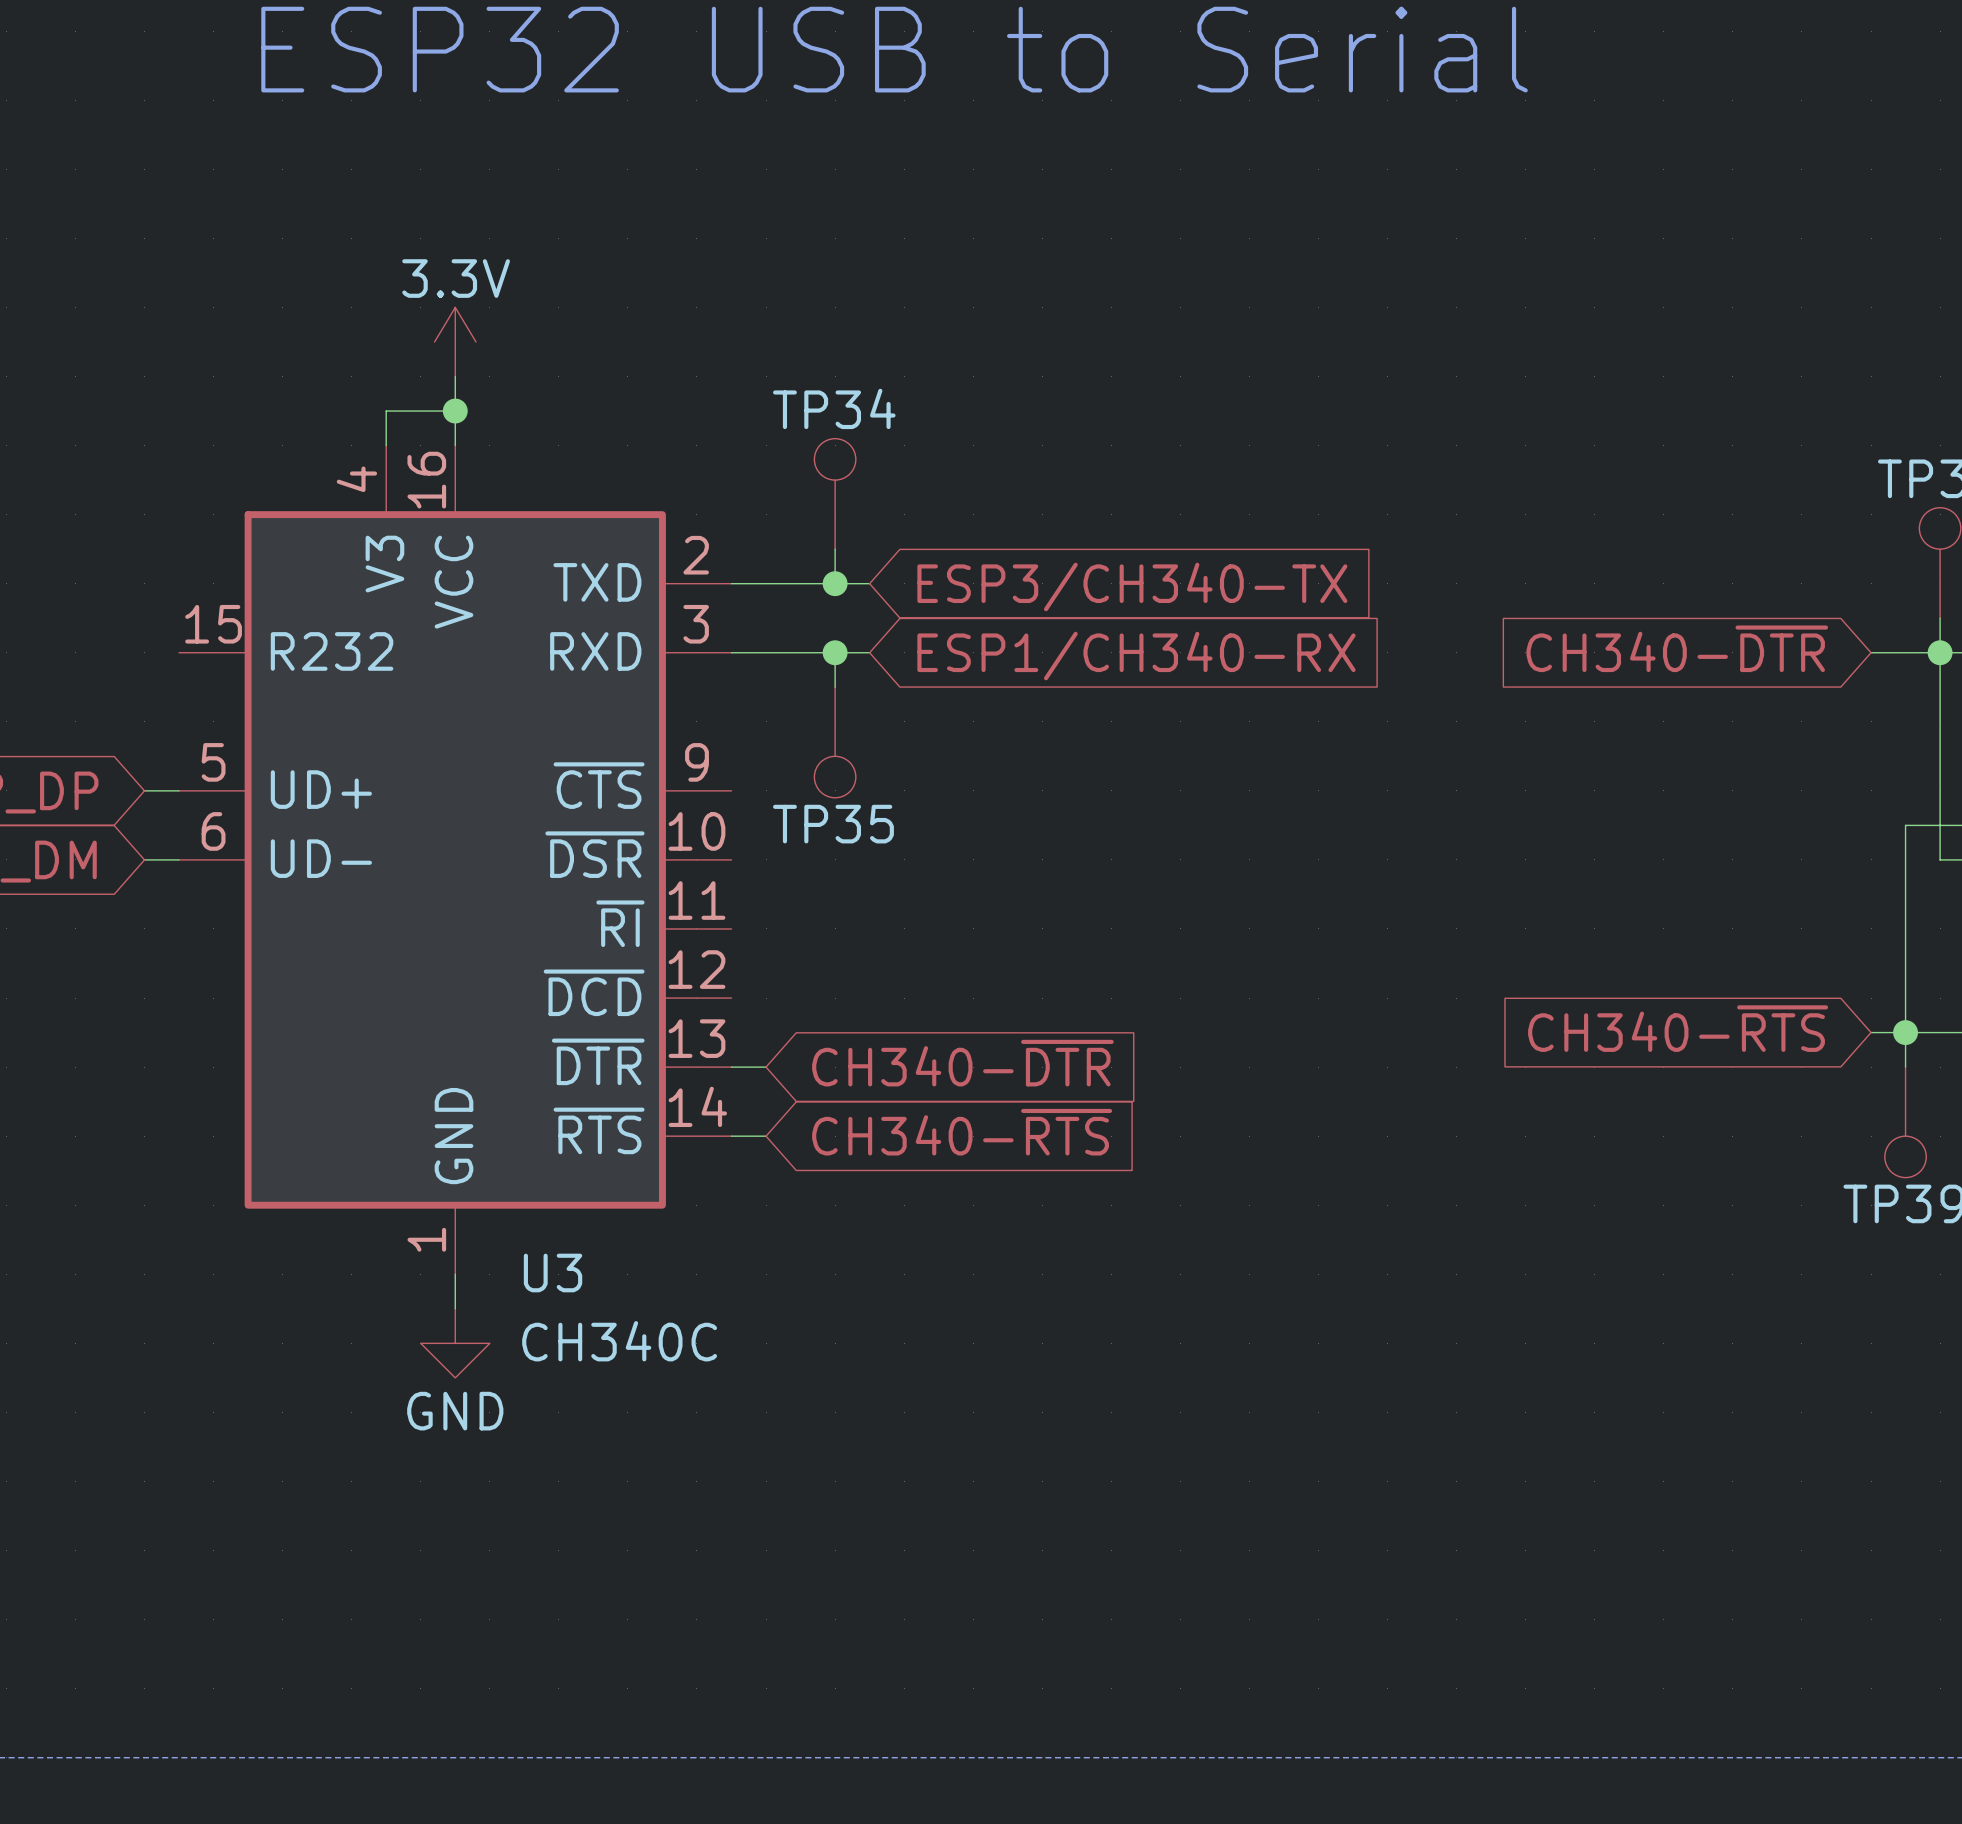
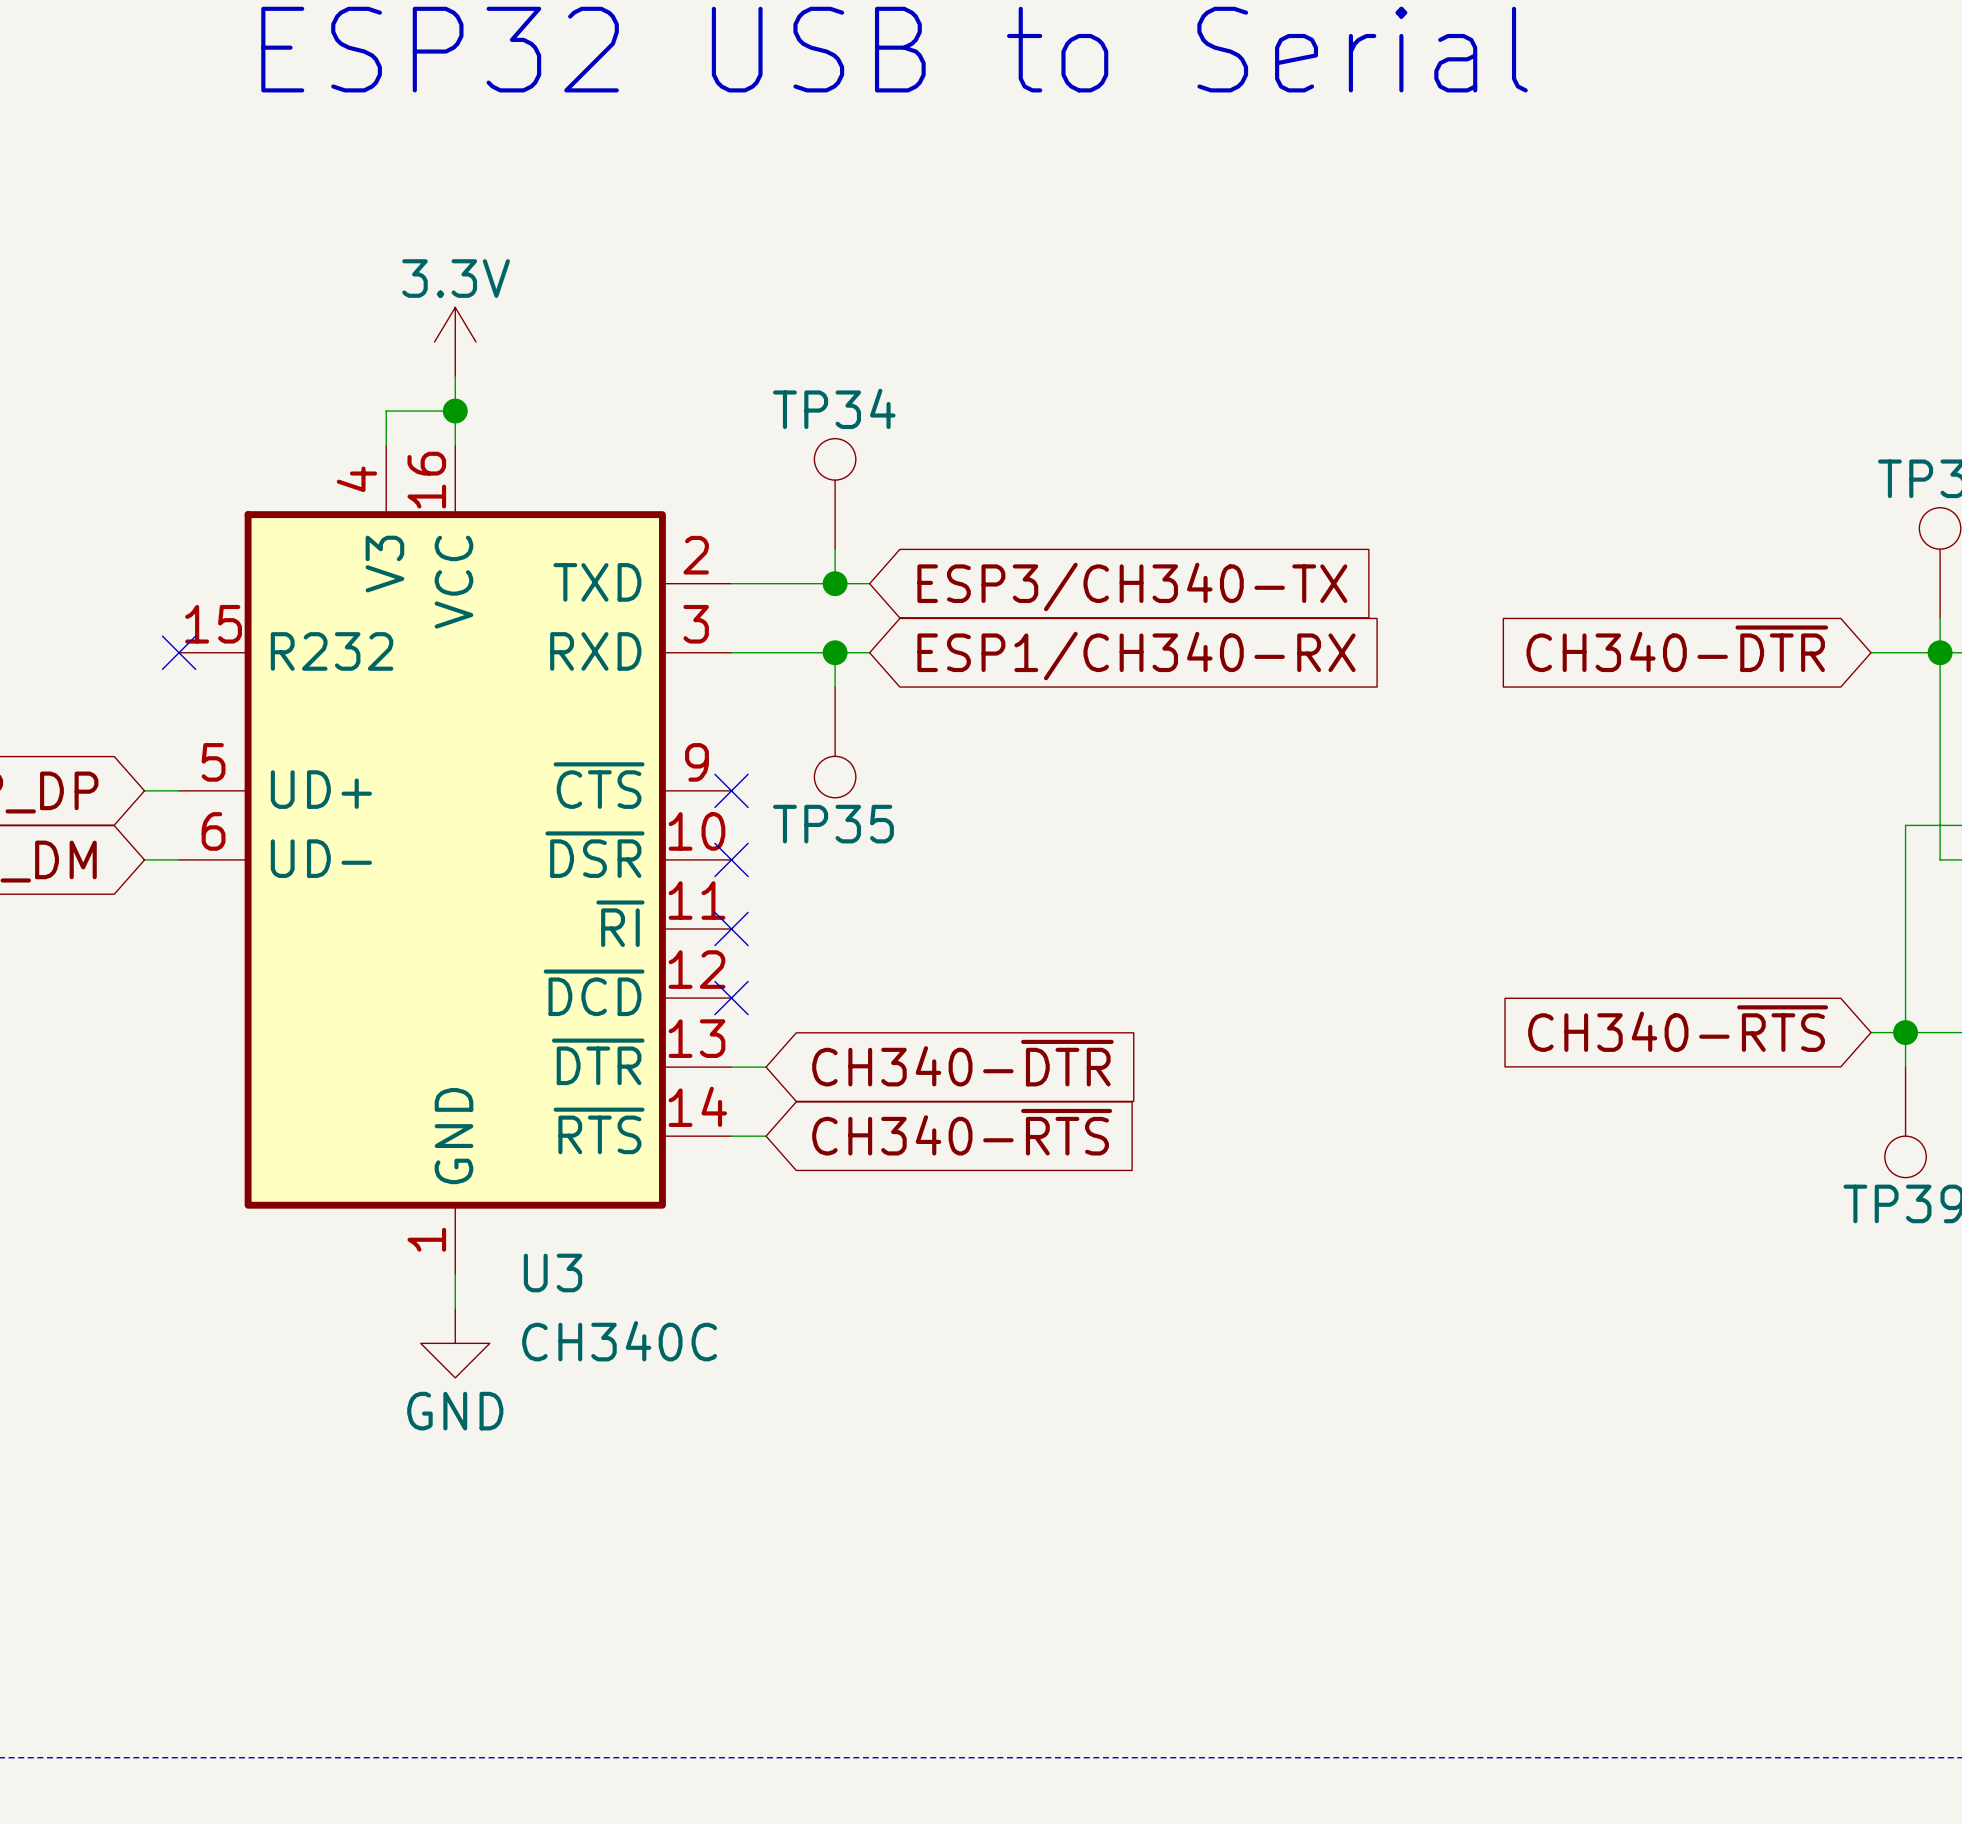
no-connect mark: none -> (179, 652)
no-connect mark: none -> (731, 790)
no-connect mark: none -> (731, 859)
no-connect mark: none -> (731, 928)
no-connect mark: none -> (731, 998)

